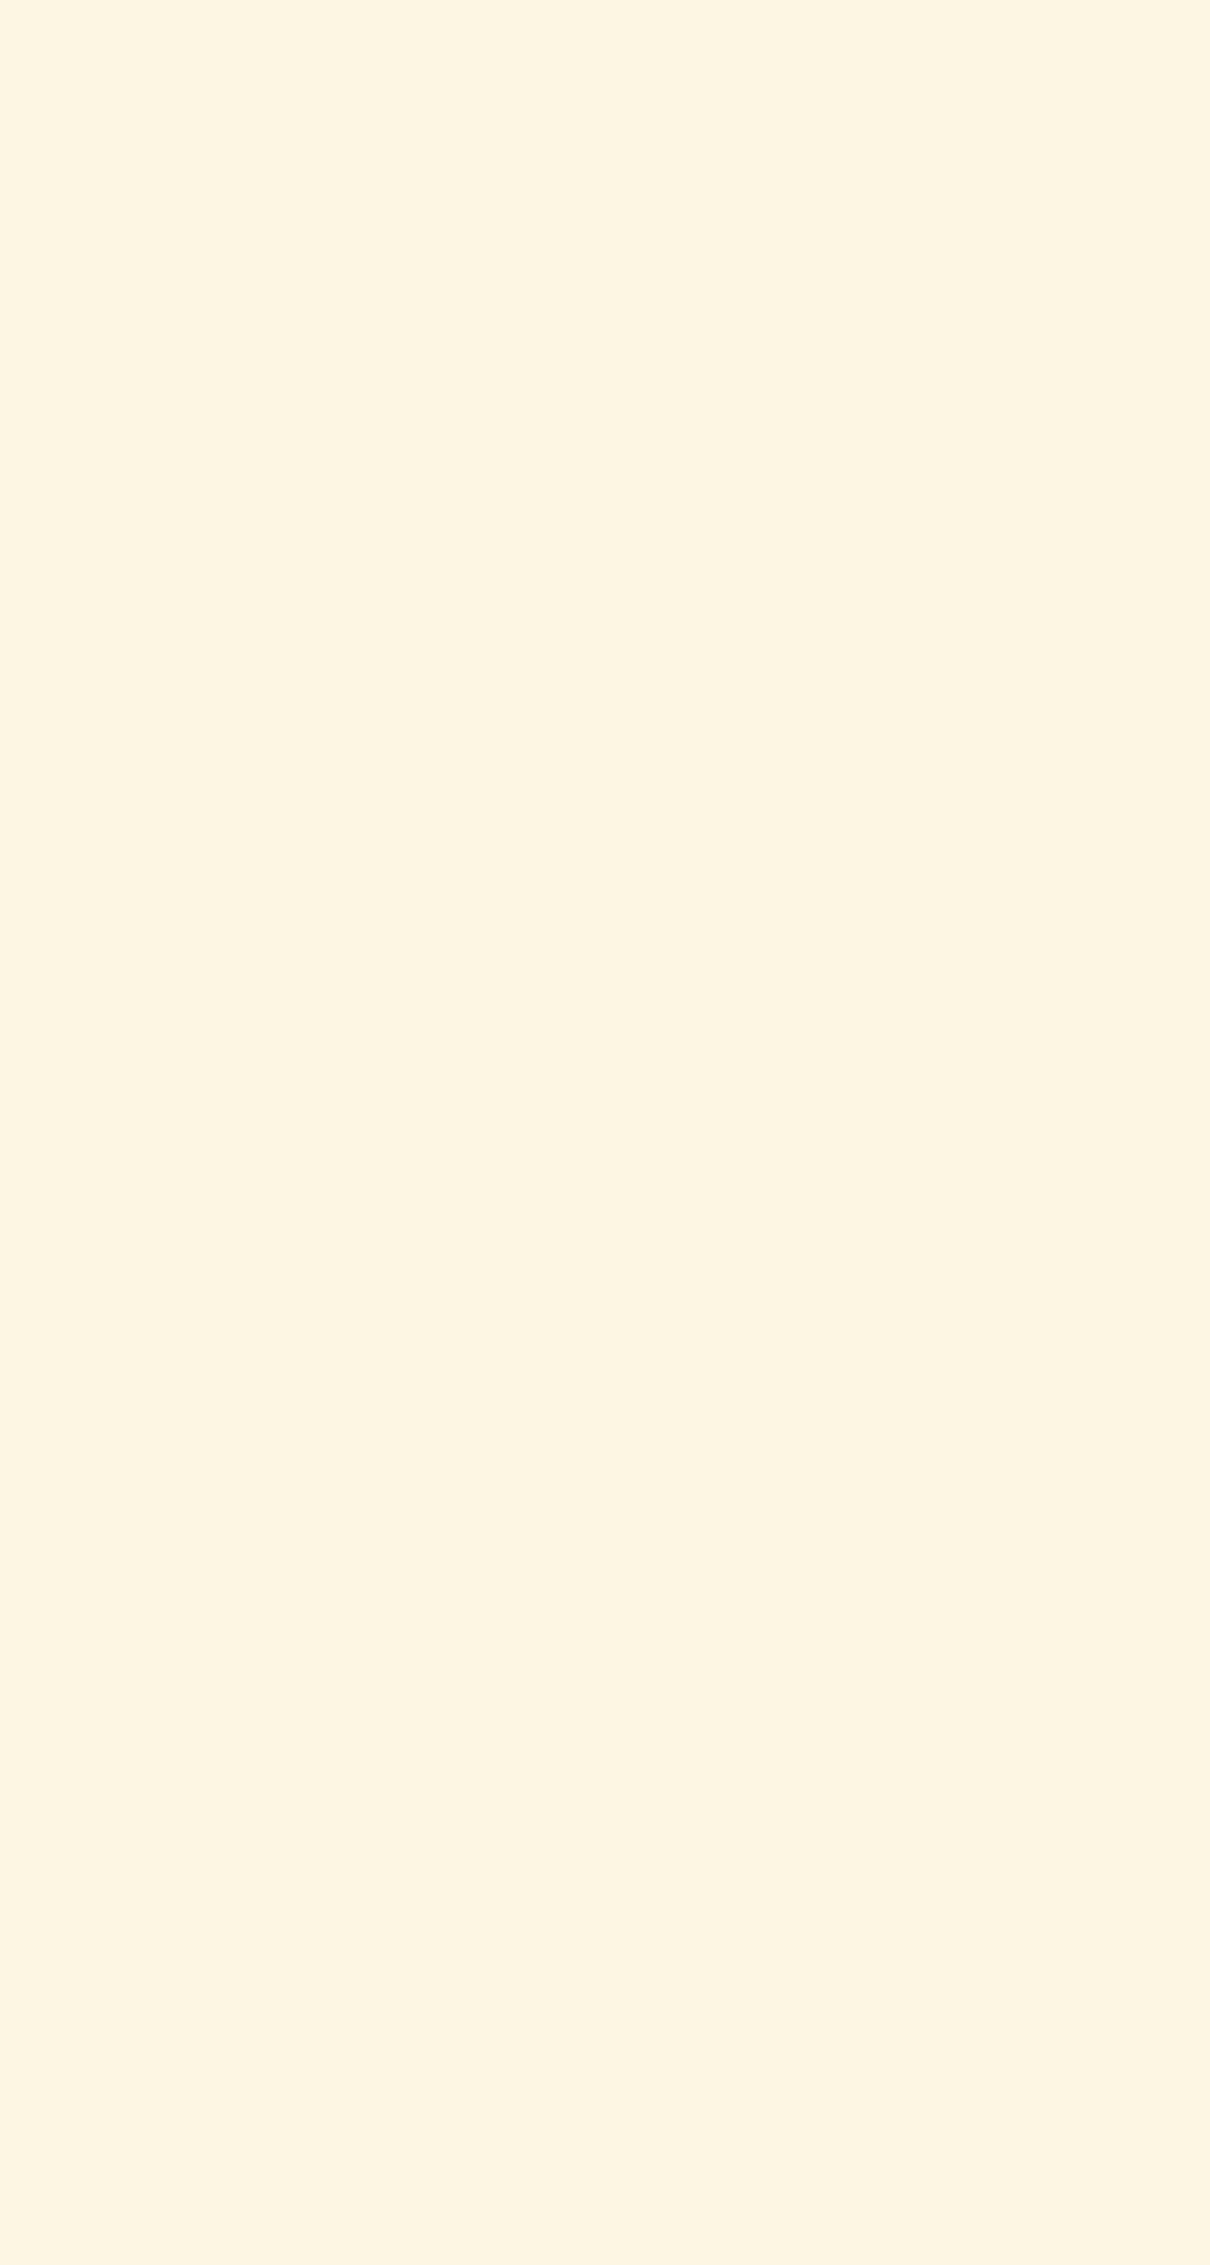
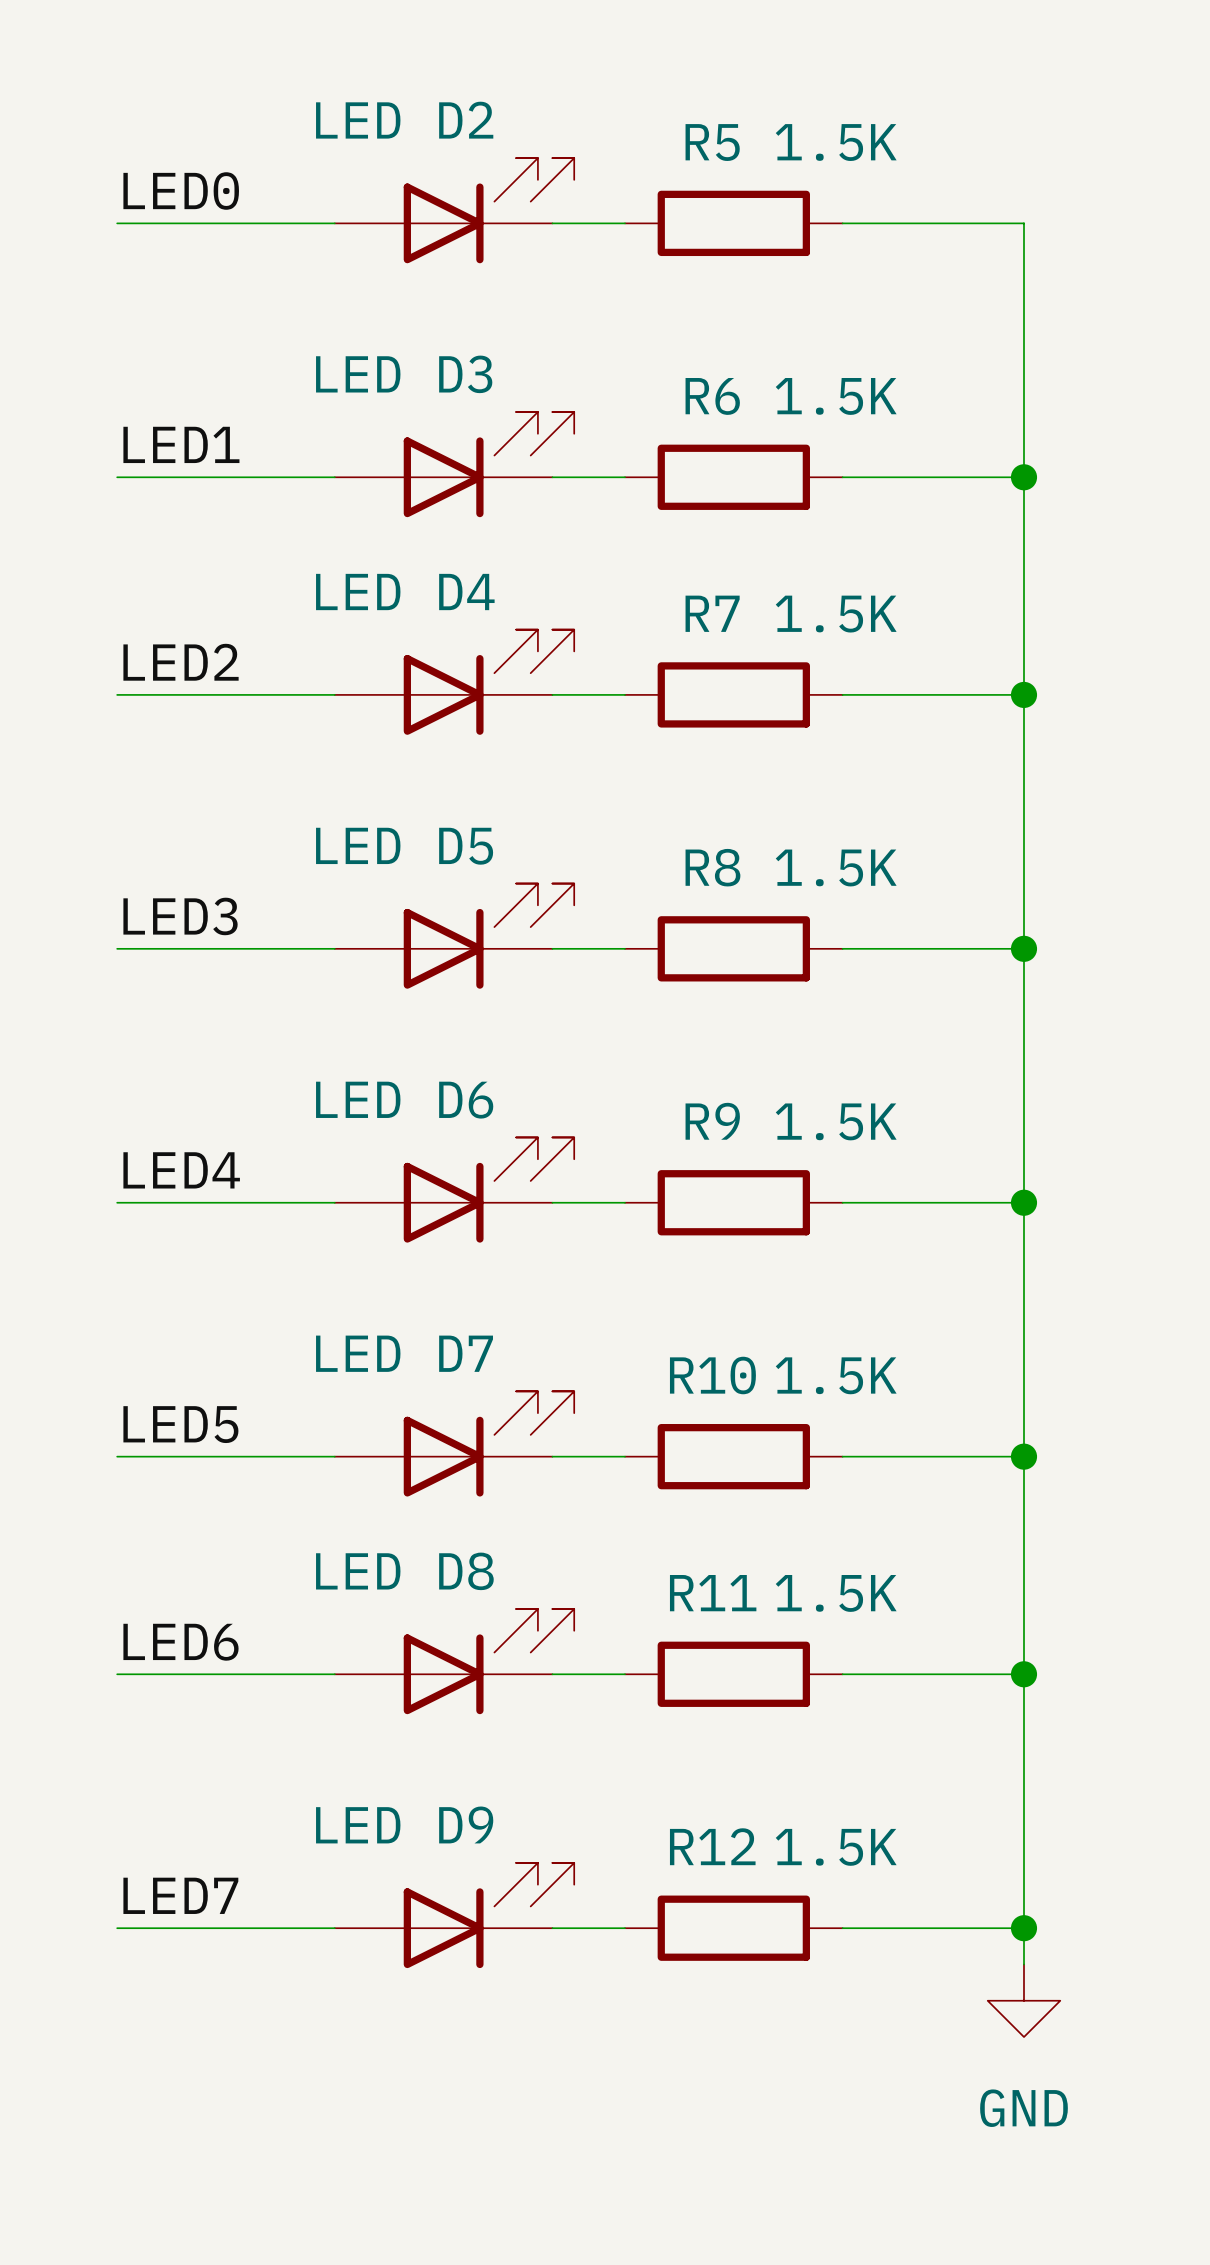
label: none -> LED0 (181, 191)
D2: none -> LED (454, 210)
wire: none -> (117, 223) (334, 223)
wire: none -> (552, 223) (624, 223)
R5: none -> 1.5K (733, 223)
wire: none -> (842, 223) (1023, 223) (1023, 1964)
label: none -> LED1 (181, 444)
D3: none -> LED (454, 464)
wire: none -> (117, 477) (334, 477)
wire: none -> (552, 477) (624, 477)
R6: none -> 1.5K (733, 477)
wire: none -> (842, 477) (1023, 477)
junction: none -> (1023, 477)
label: none -> LED2 (181, 662)
D4: none -> LED (454, 682)
wire: none -> (117, 694) (334, 694)
wire: none -> (552, 694) (624, 694)
R7: none -> 1.5K (733, 694)
wire: none -> (842, 694) (1023, 694)
junction: none -> (1023, 694)
label: none -> LED3 (180, 916)
D5: none -> LED (454, 936)
wire: none -> (117, 948) (334, 948)
wire: none -> (552, 948) (624, 948)
R8: none -> 1.5K (733, 948)
wire: none -> (842, 948) (1023, 948)
junction: none -> (1023, 948)
label: none -> LED4 (181, 1170)
D6: none -> LED (454, 1190)
wire: none -> (117, 1202) (334, 1202)
wire: none -> (552, 1202) (624, 1202)
R9: none -> 1.5K (733, 1202)
wire: none -> (842, 1202) (1023, 1202)
junction: none -> (1023, 1202)
label: none -> LED5 (180, 1424)
D7: none -> LED (454, 1443)
wire: none -> (117, 1456) (334, 1456)
wire: none -> (552, 1456) (624, 1456)
R10: none -> 1.5K (733, 1456)
wire: none -> (842, 1456) (1023, 1456)
junction: none -> (1023, 1456)
label: none -> LED6 (180, 1642)
D8: none -> LED (454, 1661)
wire: none -> (117, 1674) (334, 1674)
wire: none -> (552, 1674) (624, 1674)
R11: none -> 1.5K (733, 1674)
wire: none -> (842, 1674) (1023, 1674)
junction: none -> (1023, 1674)
label: none -> LED7 (180, 1895)
D9: none -> LED (454, 1915)
wire: none -> (117, 1928) (334, 1928)
wire: none -> (552, 1928) (624, 1928)
R12: none -> 1.5K (733, 1928)
wire: none -> (842, 1928) (1023, 1928)
junction: none -> (1023, 1928)
power symbol: none -> GND (1023, 2000)

